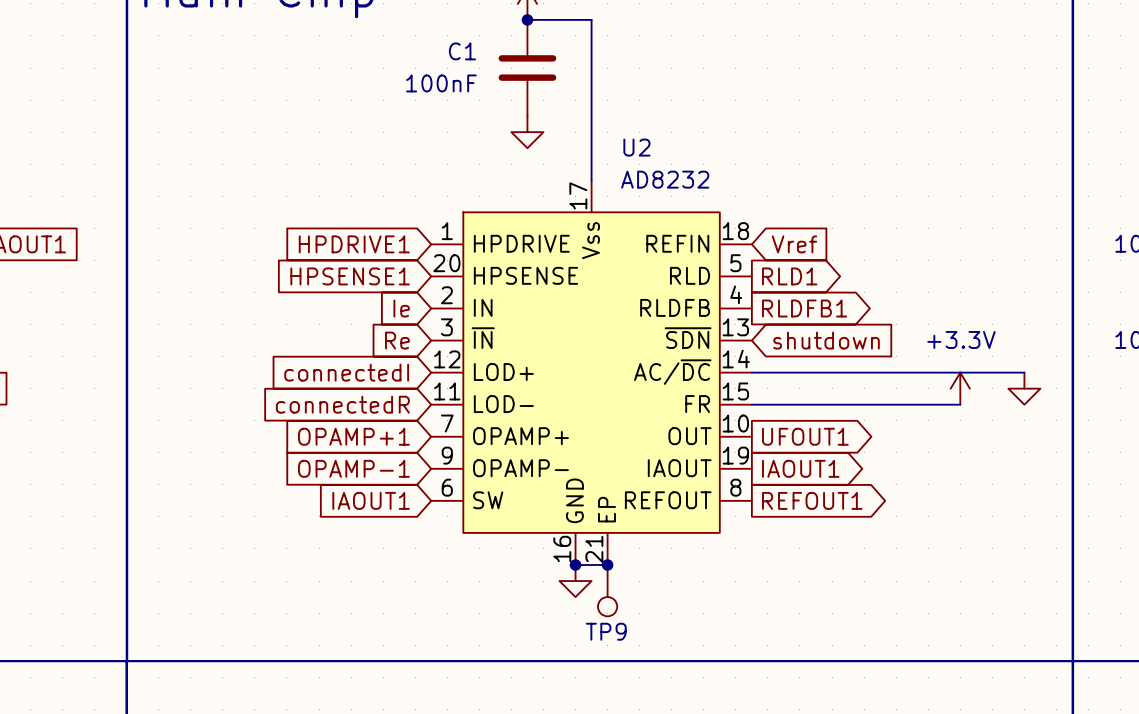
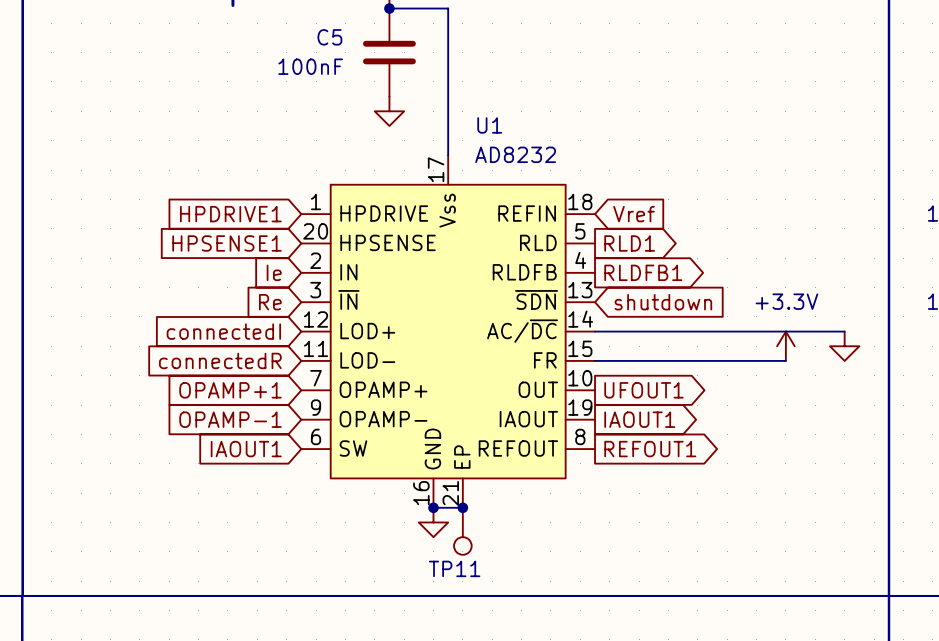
C1 name: C1 (462, 51) -> C5 (329, 37)
U2 name: U2 (636, 147) -> U1 (489, 125)
TP9 name: TP9 (606, 631) -> TP11 (454, 568)

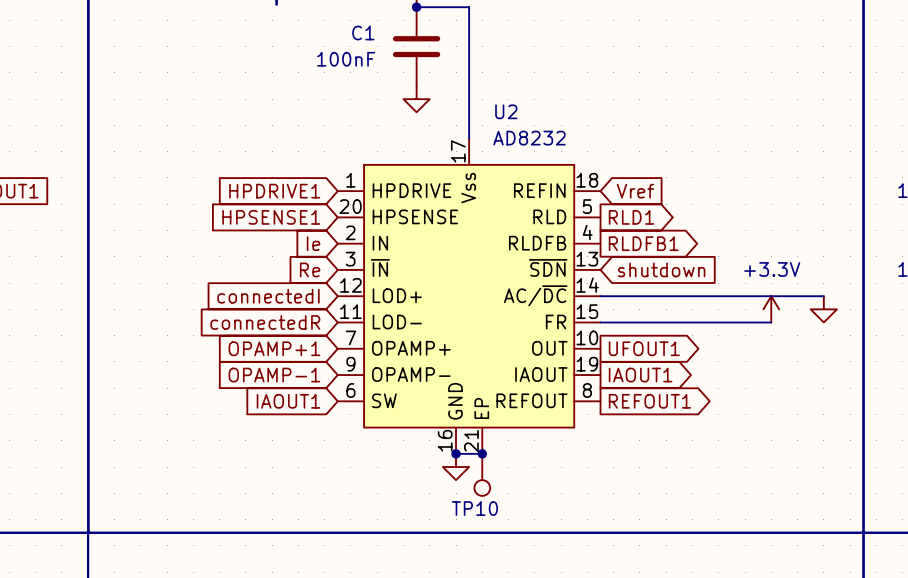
C5 name: C5 (329, 37) -> C1 (363, 33)
U1 name: U1 (489, 125) -> U2 (506, 111)
TP11 name: TP11 (454, 568) -> TP10 (474, 508)

